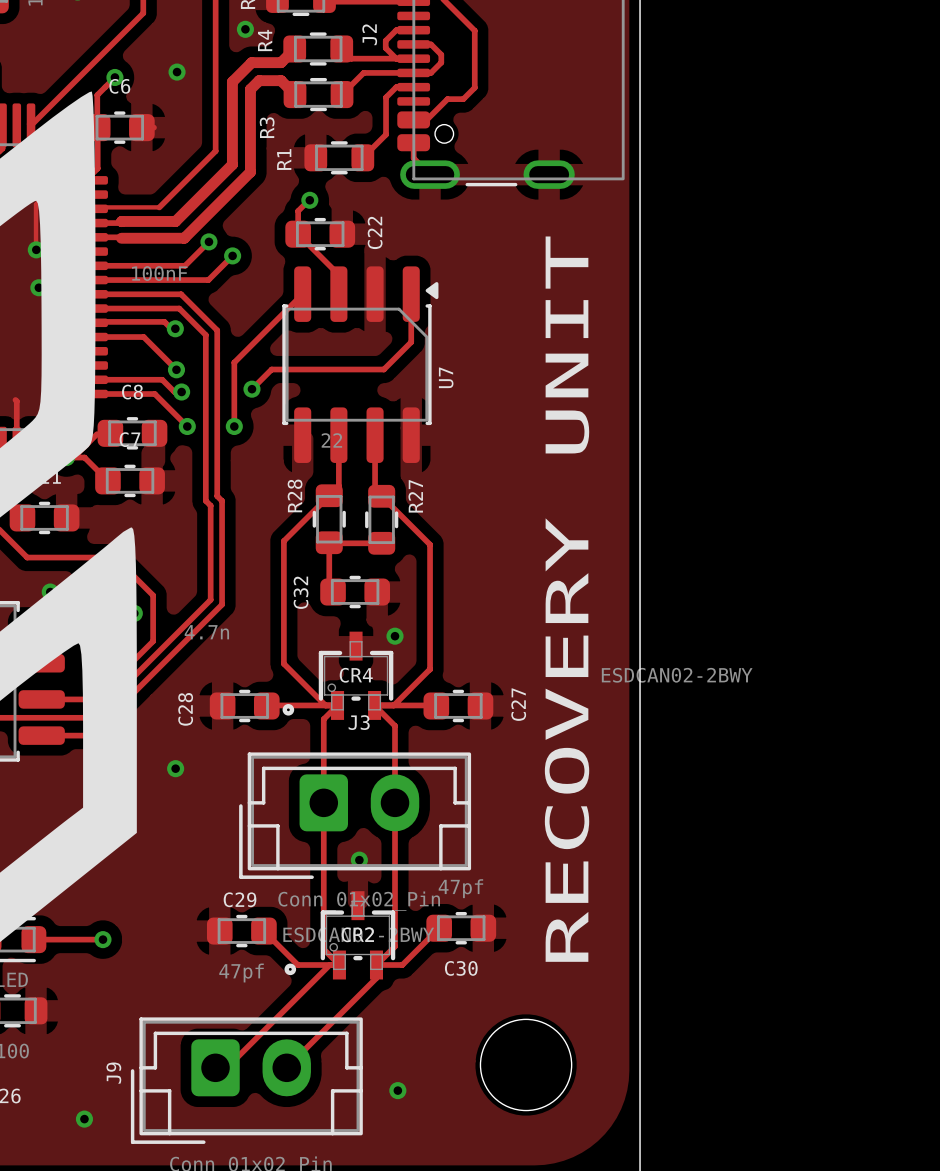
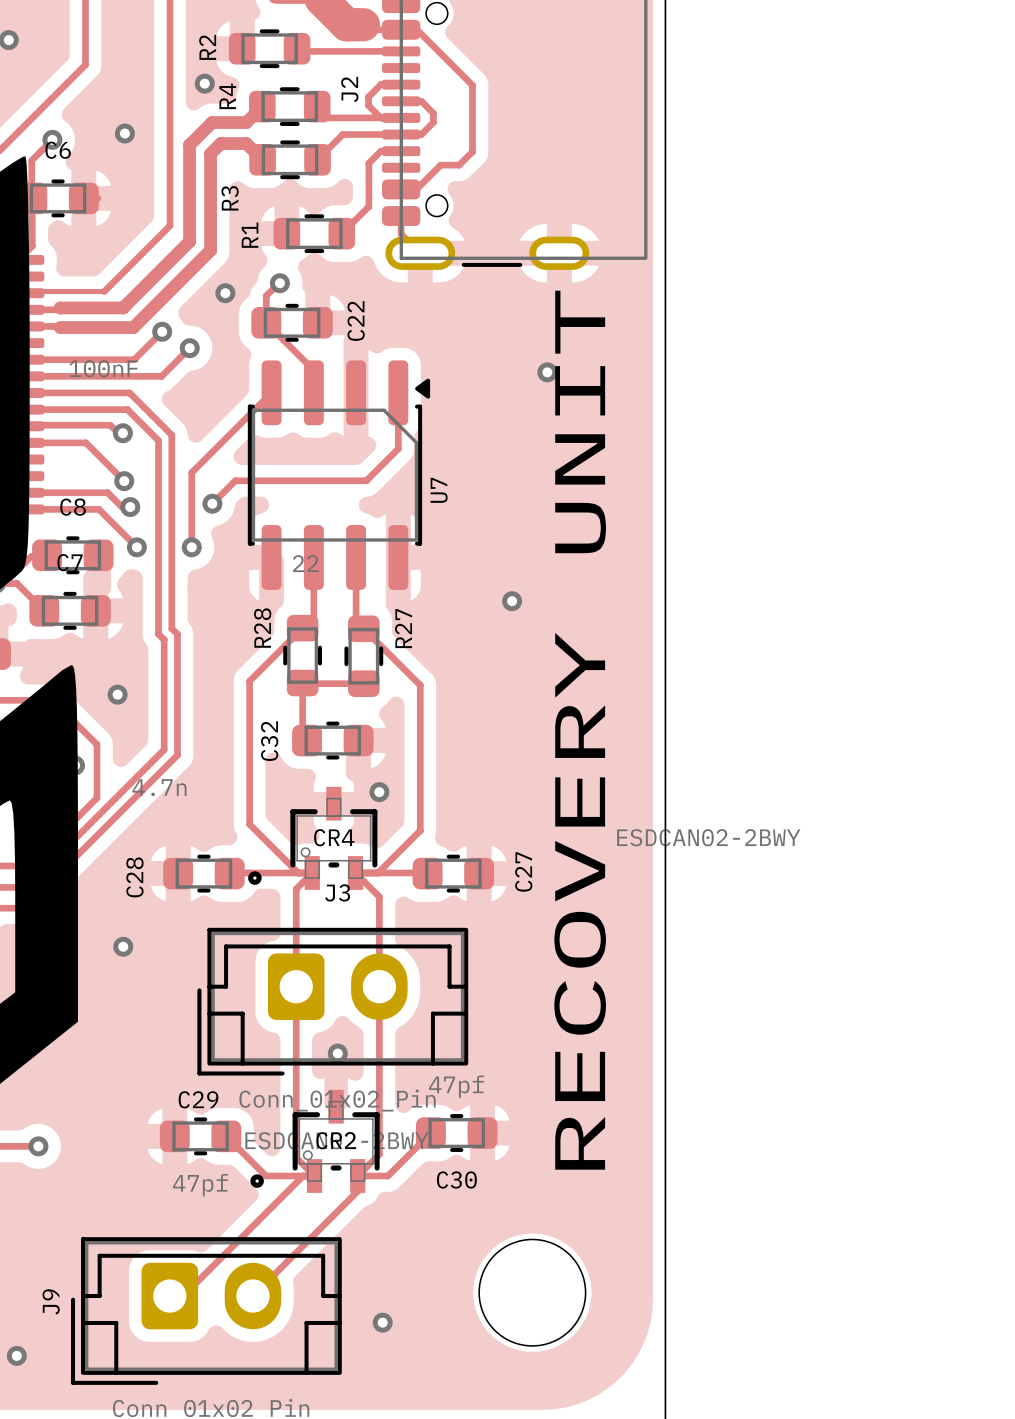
via: none -> (225, 293)
via: none -> (547, 372)
via: none -> (512, 601)
via: none -> (117, 694)

